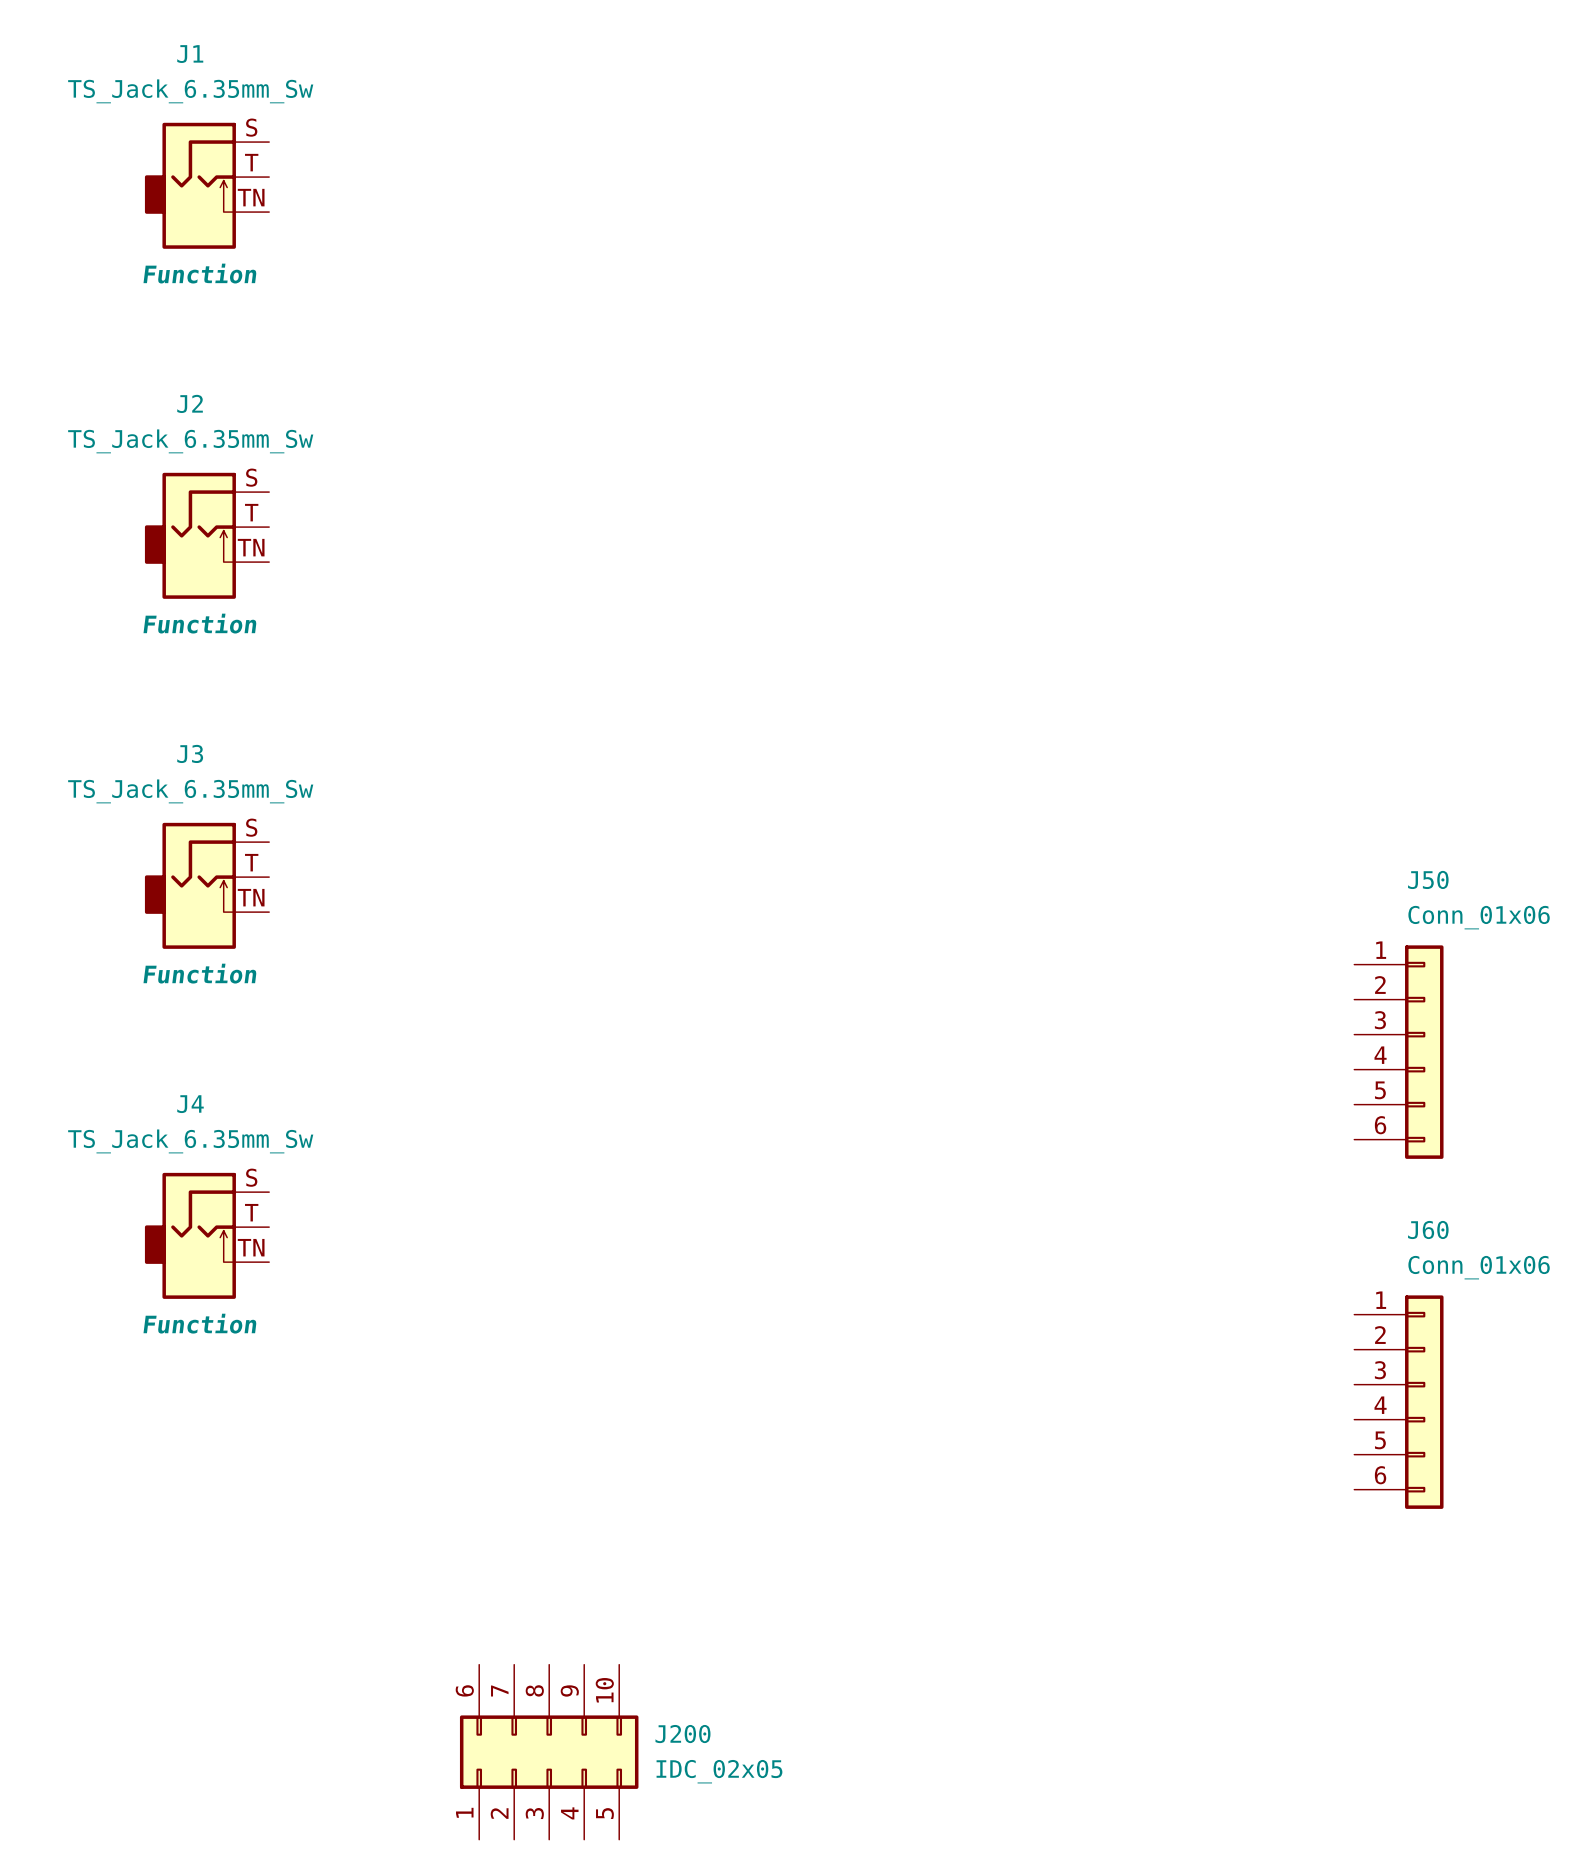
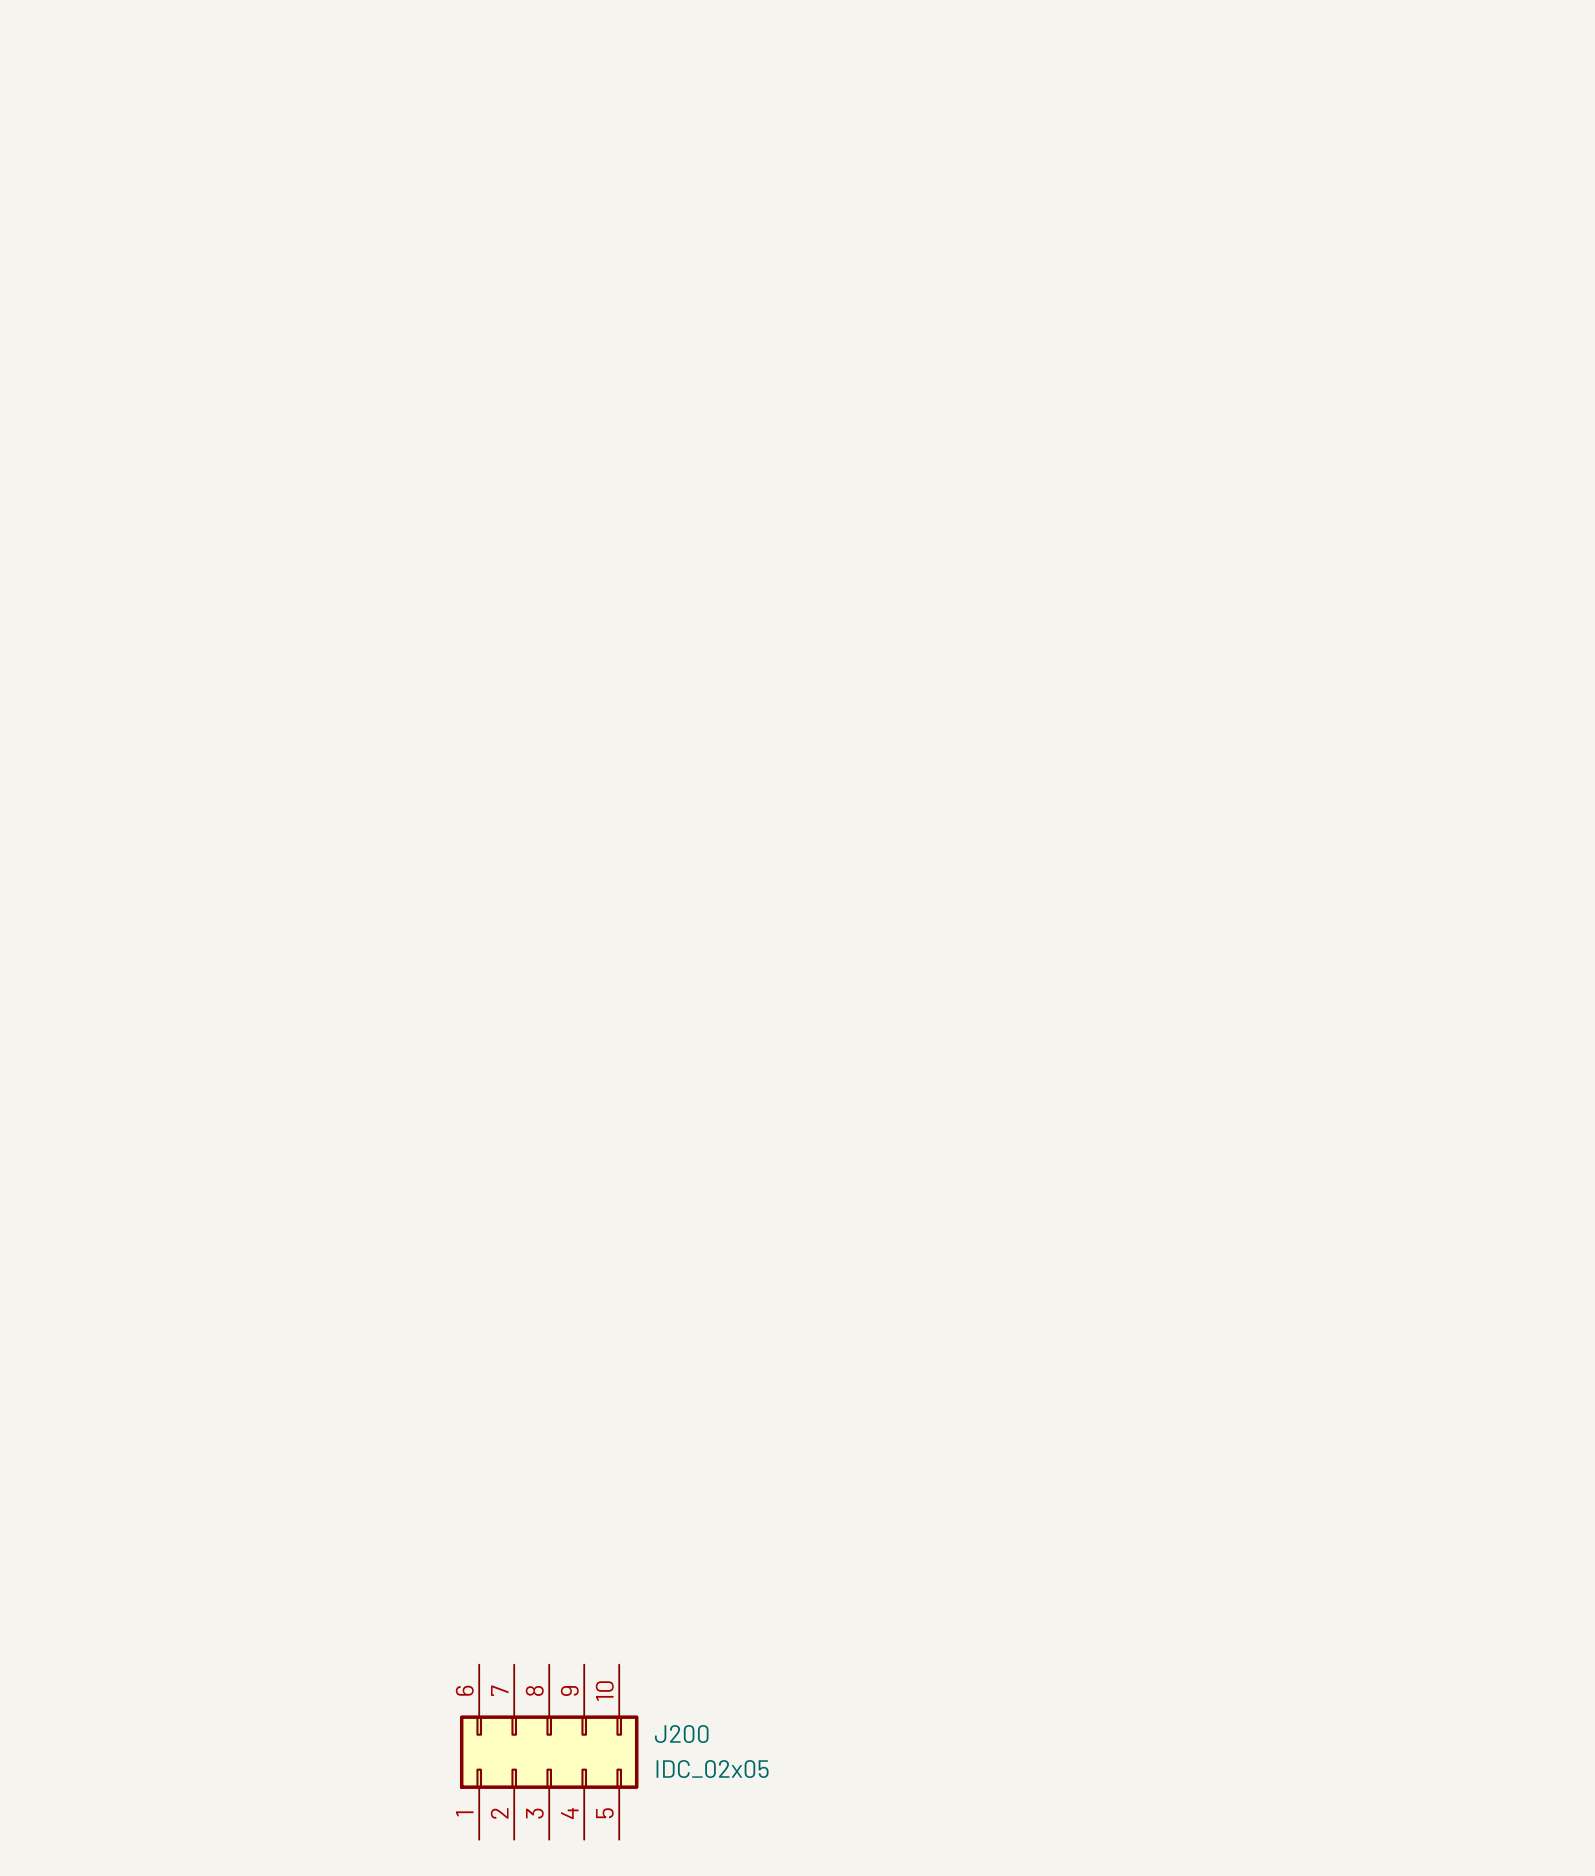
J1: TS_Jack_6.35mm_Sw (207, 185) -> none
J2: TS_Jack_6.35mm_Sw (207, 535) -> none
J3: TS_Jack_6.35mm_Sw (207, 885) -> none
J50: Conn_01x06 (1398, 1052) -> none
J4: TS_Jack_6.35mm_Sw (207, 1235) -> none
J60: Conn_01x06 (1398, 1402) -> none

